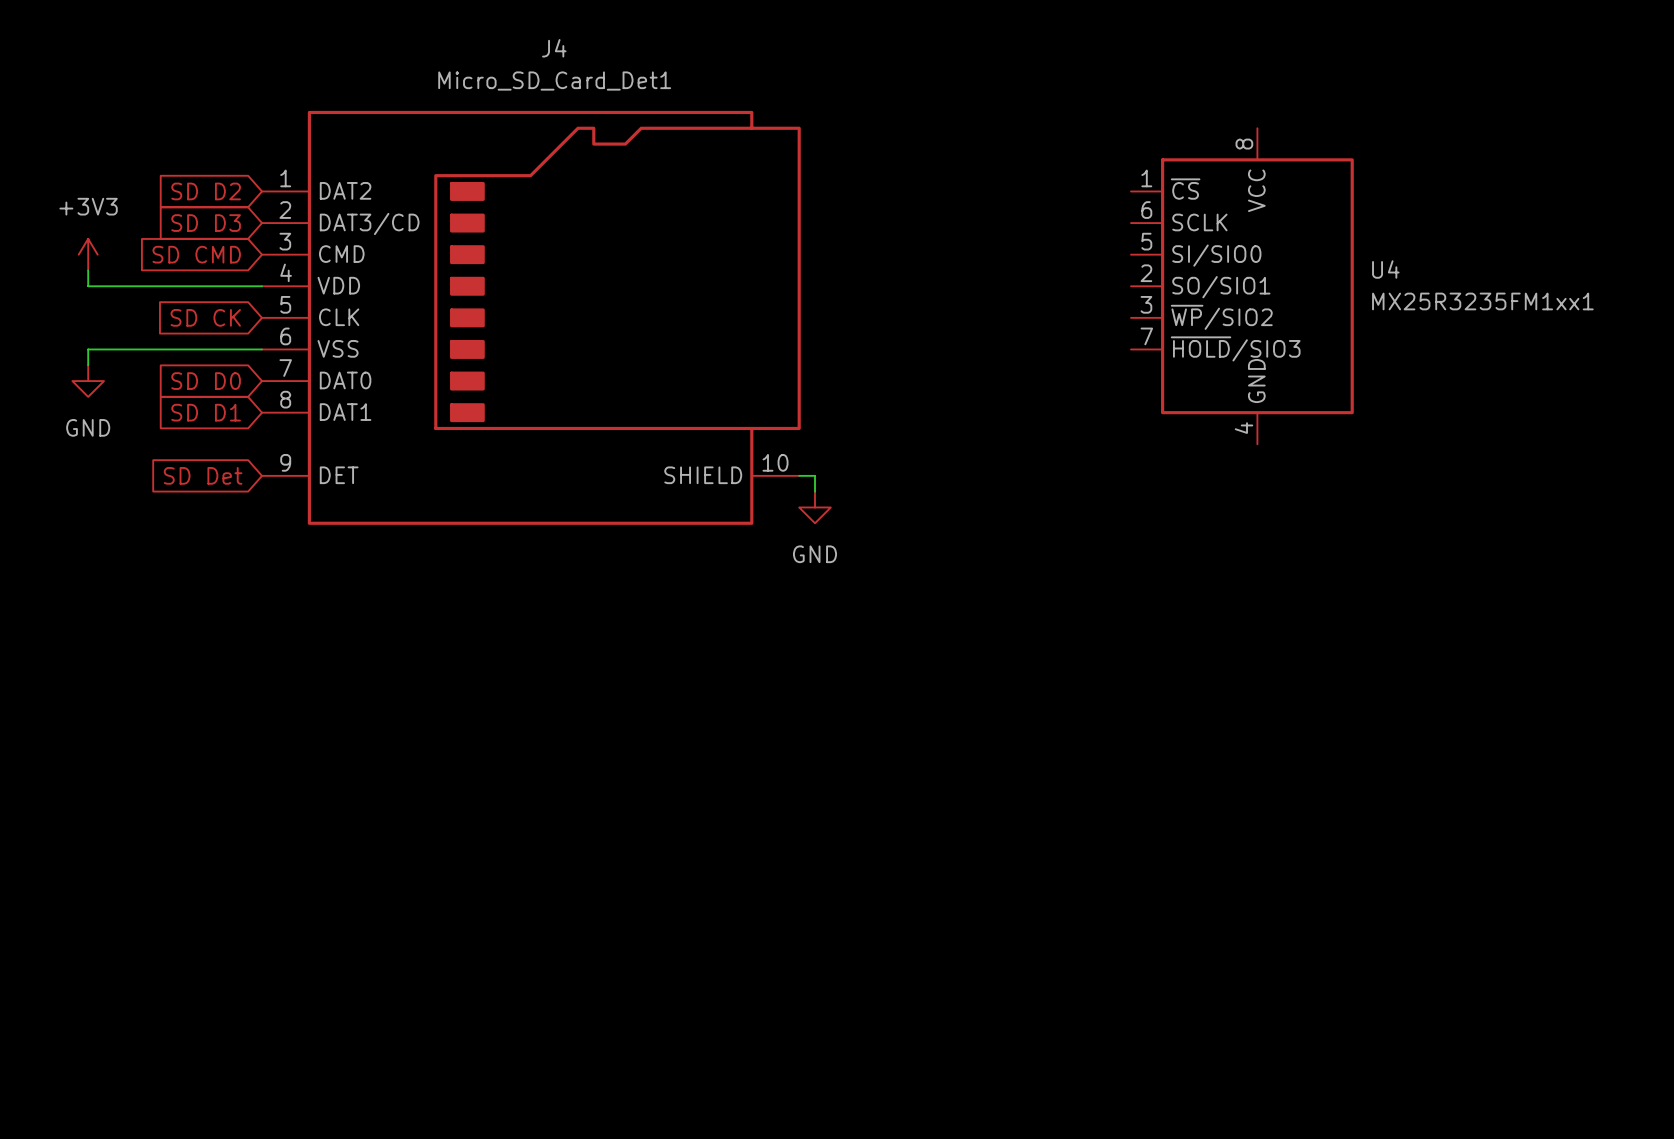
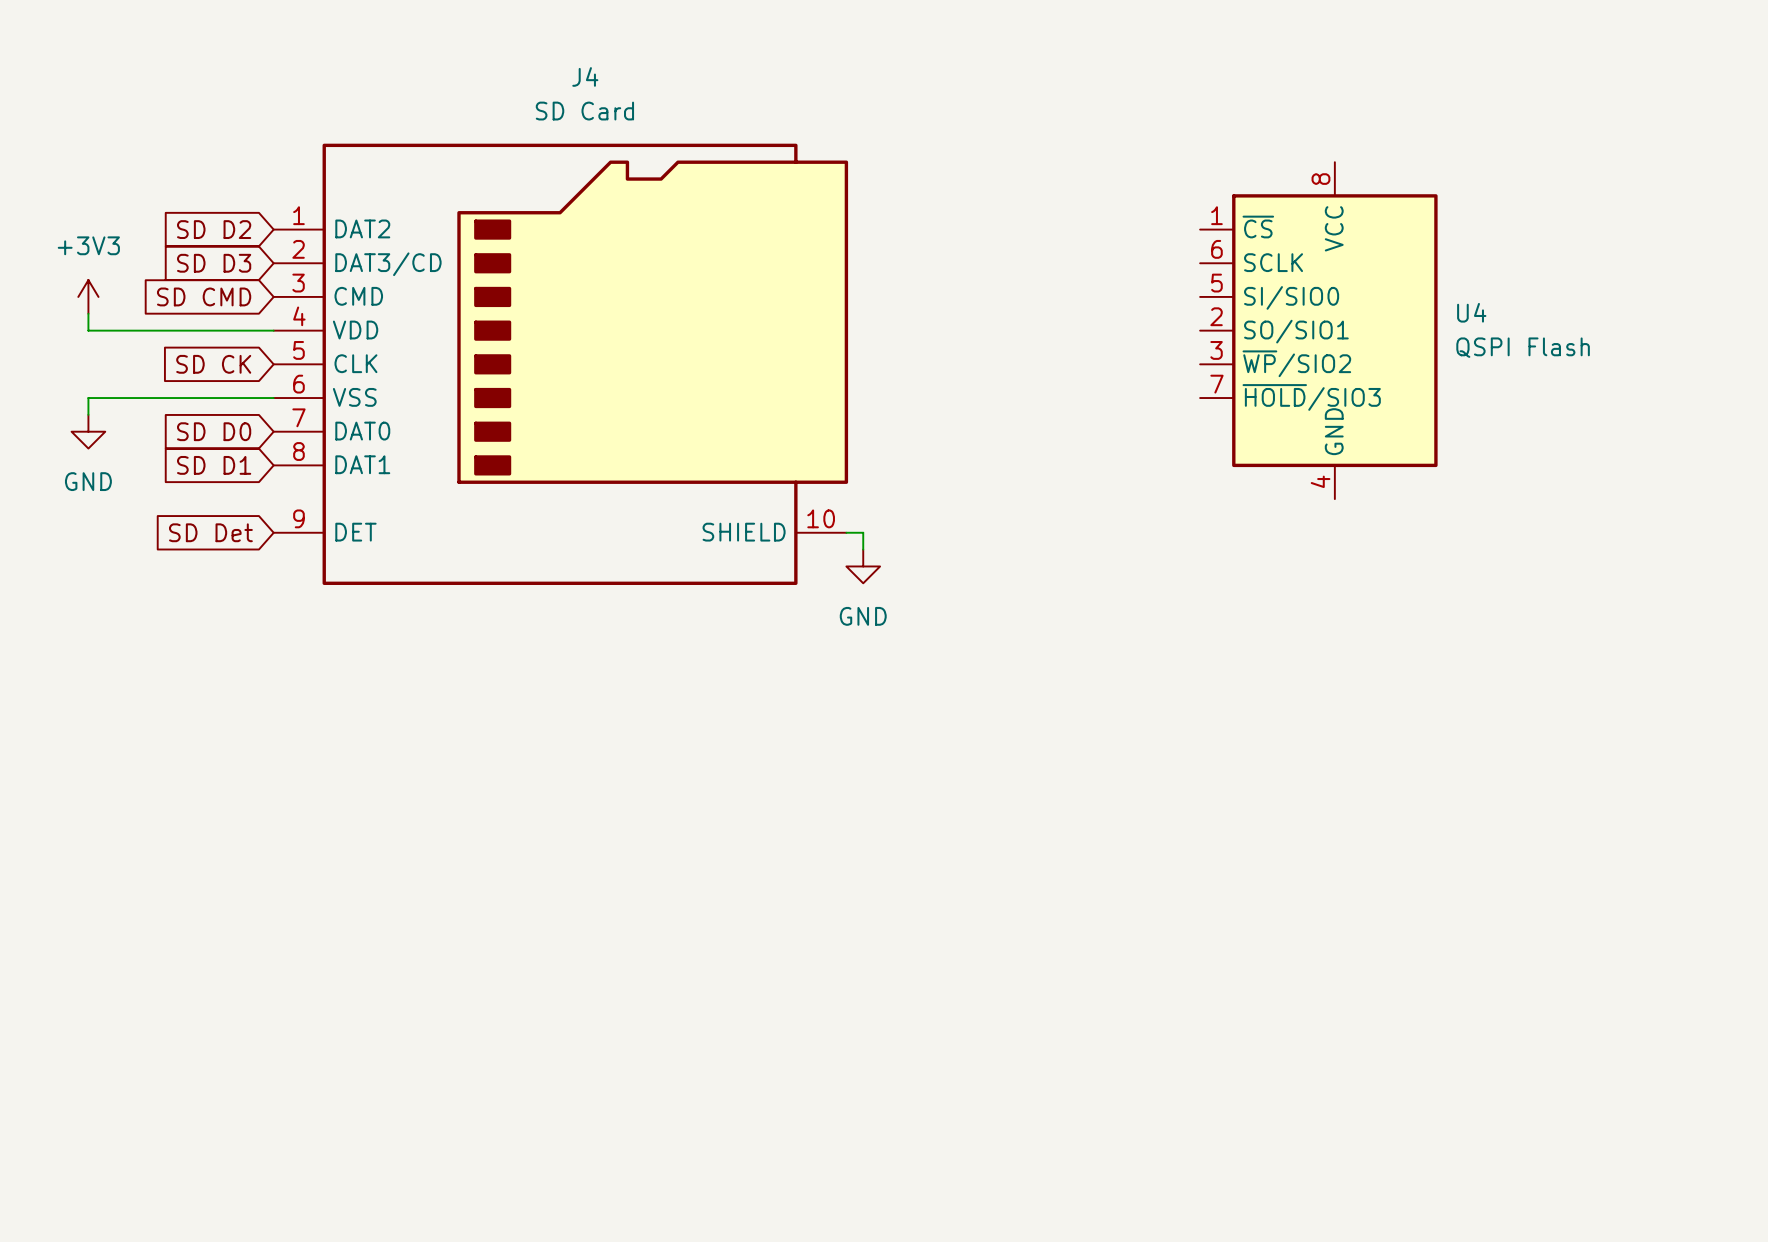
J4 value: Micro_SD_Card_Det1 (554, 81) -> SD Card (584, 111)
U4 value: MX25R3235FM1xx1 (1482, 301) -> QSPI Flash (1523, 347)

